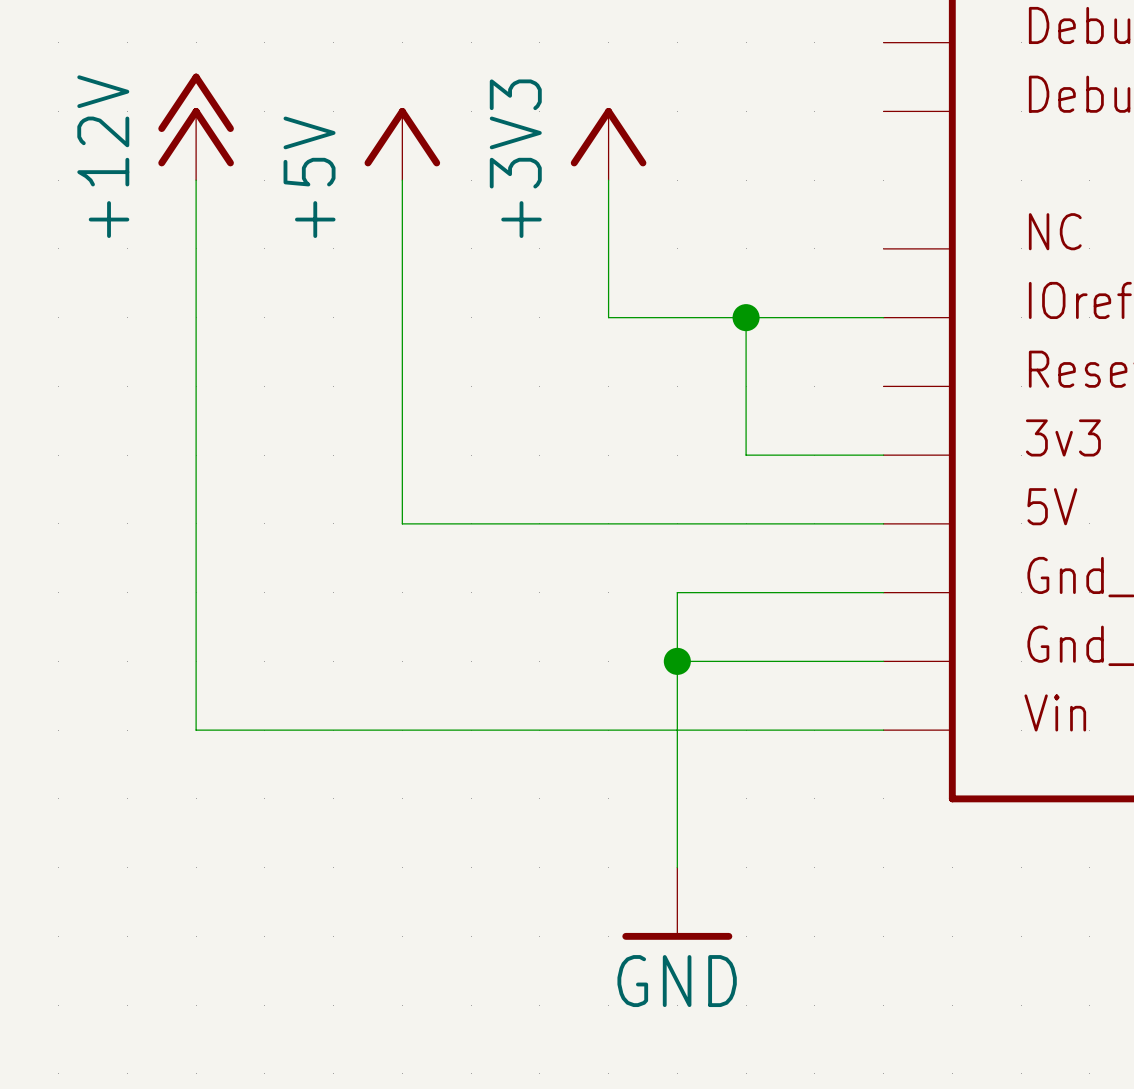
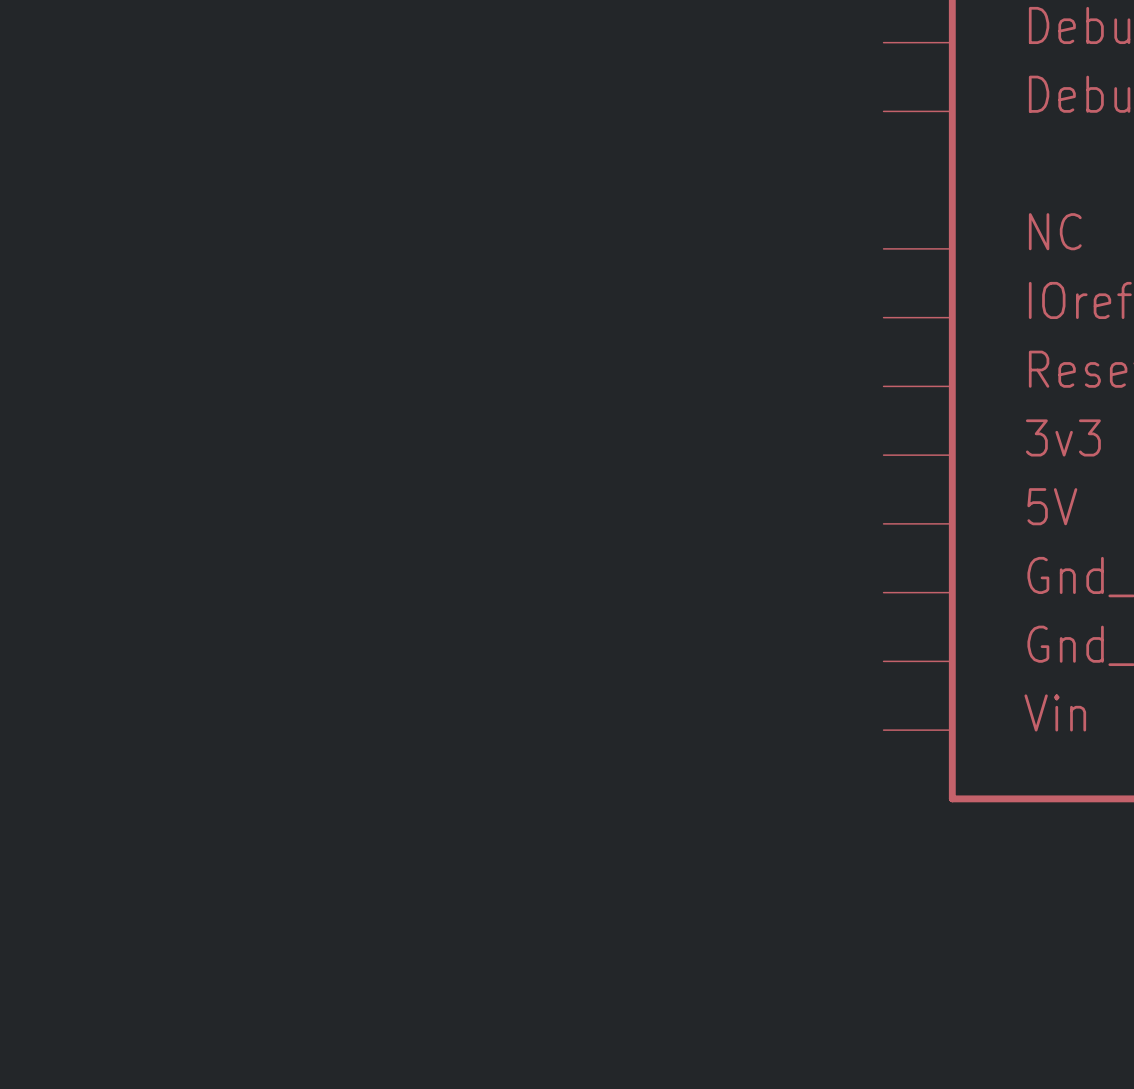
power symbol: +12V (196, 126) -> none
power symbol: +5V (402, 144) -> none
power symbol: +3V3 (608, 144) -> none
wire: (196, 180) (196, 730) (883, 730) -> none
wire: (402, 180) (402, 523) (883, 523) -> none
wire: (608, 180) (608, 317) (883, 317) -> none
wire: (746, 317) (746, 455) (883, 455) -> none
junction: (746, 317) -> none
wire: (883, 592) (677, 592) (677, 867) -> none
wire: (677, 661) (883, 661) -> none
junction: (677, 661) -> none
power symbol: GND (677, 903) -> none

